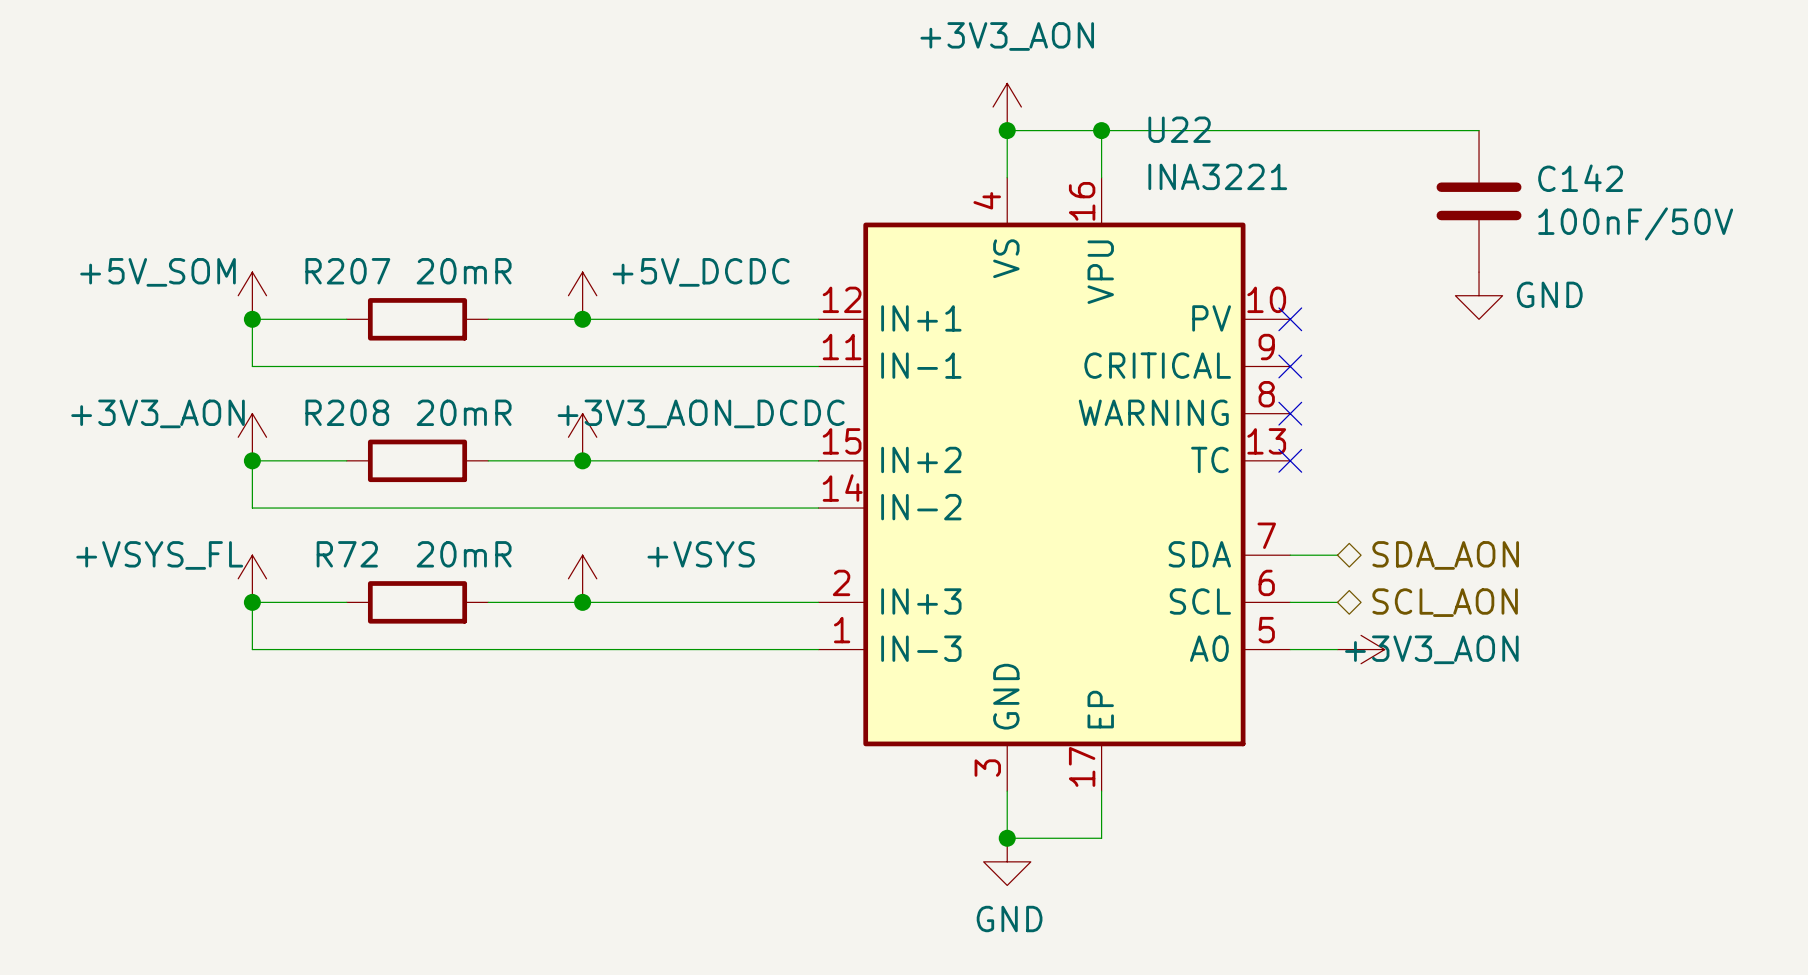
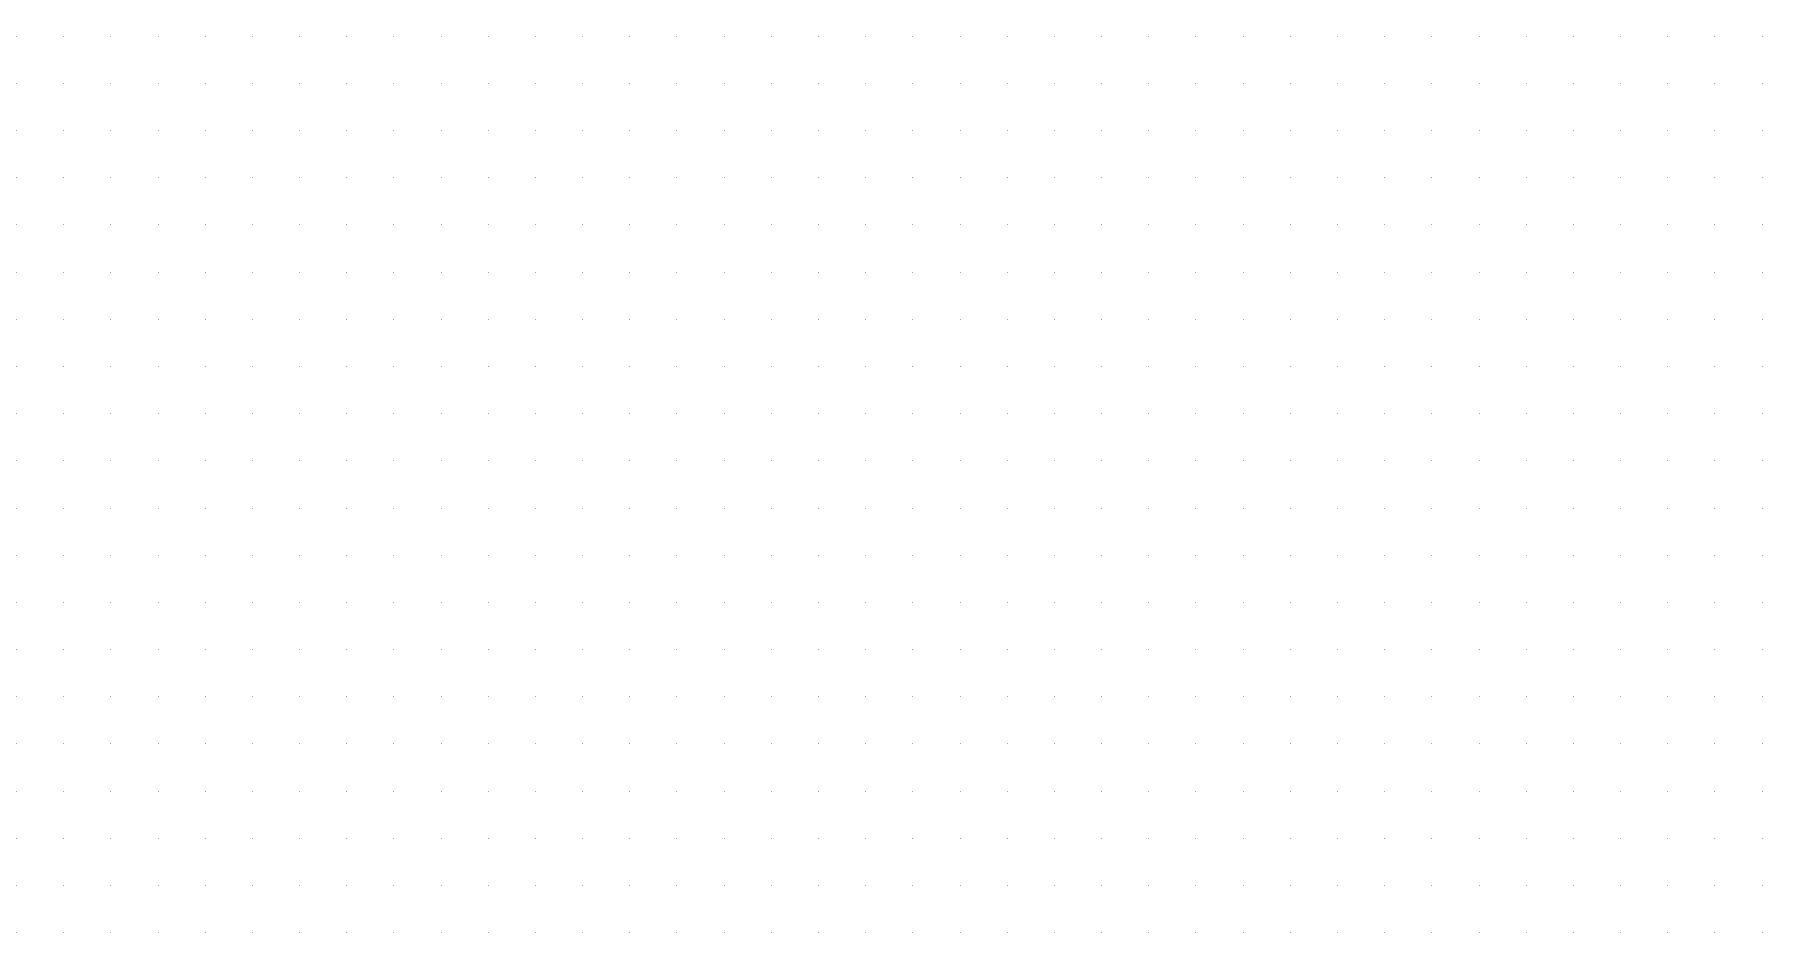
power symbol: +3V3_AON (1007, 107) -> none
junction: (1007, 130) -> none
wire: (1101, 130) (1101, 177) -> none
junction: (1101, 130) -> none
wire: (1479, 130) (1007, 130) (1007, 177) -> none
C142: 100nF/50V (1479, 201) -> none
power symbol: +5V_SOM (252, 295) -> none
power symbol: +5V_DCDC (582, 295) -> none
power symbol: GND (1479, 295) -> none
junction: (252, 319) -> none
wire: (346, 319) (252, 319) (252, 366) (818, 366) -> none
R207: 20mR (417, 319) -> none
wire: (488, 319) (818, 319) -> none
junction: (582, 319) -> none
no-connect mark: (1290, 319) -> none
no-connect mark: (1290, 366) -> none
no-connect mark: (1290, 413) -> none
power symbol: +3V3_AON (252, 437) -> none
power symbol: +3V3_AON_DCDC (582, 437) -> none
junction: (252, 460) -> none
wire: (346, 460) (252, 460) (252, 508) (818, 508) -> none
R208: 20mR (417, 460) -> none
wire: (488, 460) (818, 460) -> none
junction: (582, 460) -> none
no-connect mark: (1290, 460) -> none
U22: INA3221 (1054, 484) -> none
wire: (1290, 555) (1337, 555) -> none
hierarchical label: SDA_AON (1445, 555) -> none
power symbol: +VSYS_FL (252, 578) -> none
power symbol: +VSYS (582, 578) -> none
junction: (252, 602) -> none
wire: (346, 602) (252, 602) (252, 649) (818, 649) -> none
R72: 20mR (417, 602) -> none
wire: (488, 602) (818, 602) -> none
junction: (582, 602) -> none
wire: (1290, 602) (1337, 602) -> none
hierarchical label: SCL_AON (1445, 602) -> none
wire: (1290, 649) (1337, 649) -> none
power symbol: +3V3_AON (1361, 649) -> none
wire: (1007, 791) (1007, 838) (1101, 838) (1101, 791) -> none
junction: (1007, 838) -> none
power symbol: GND (1007, 861) -> none

